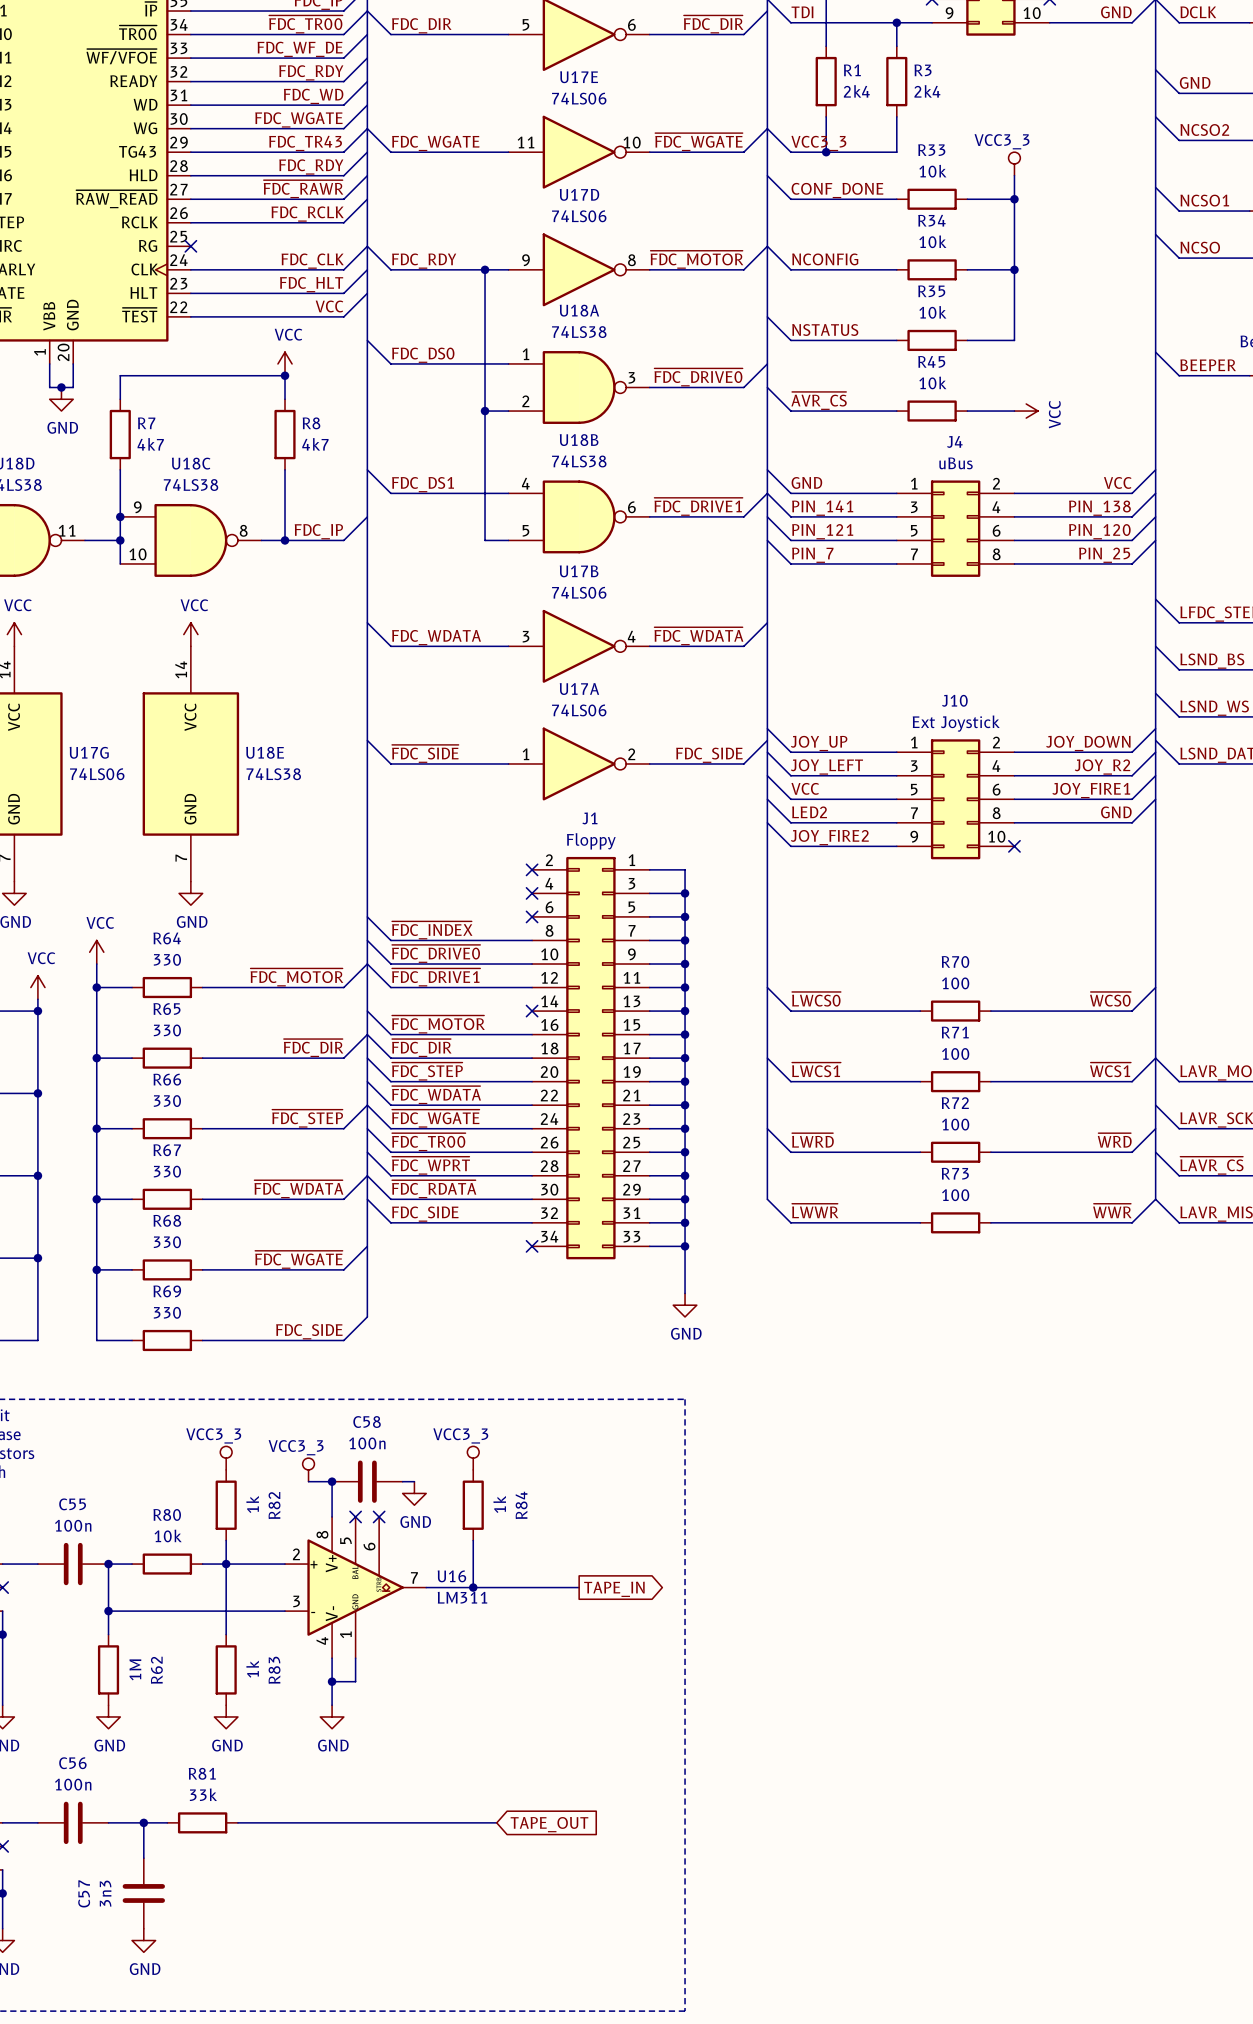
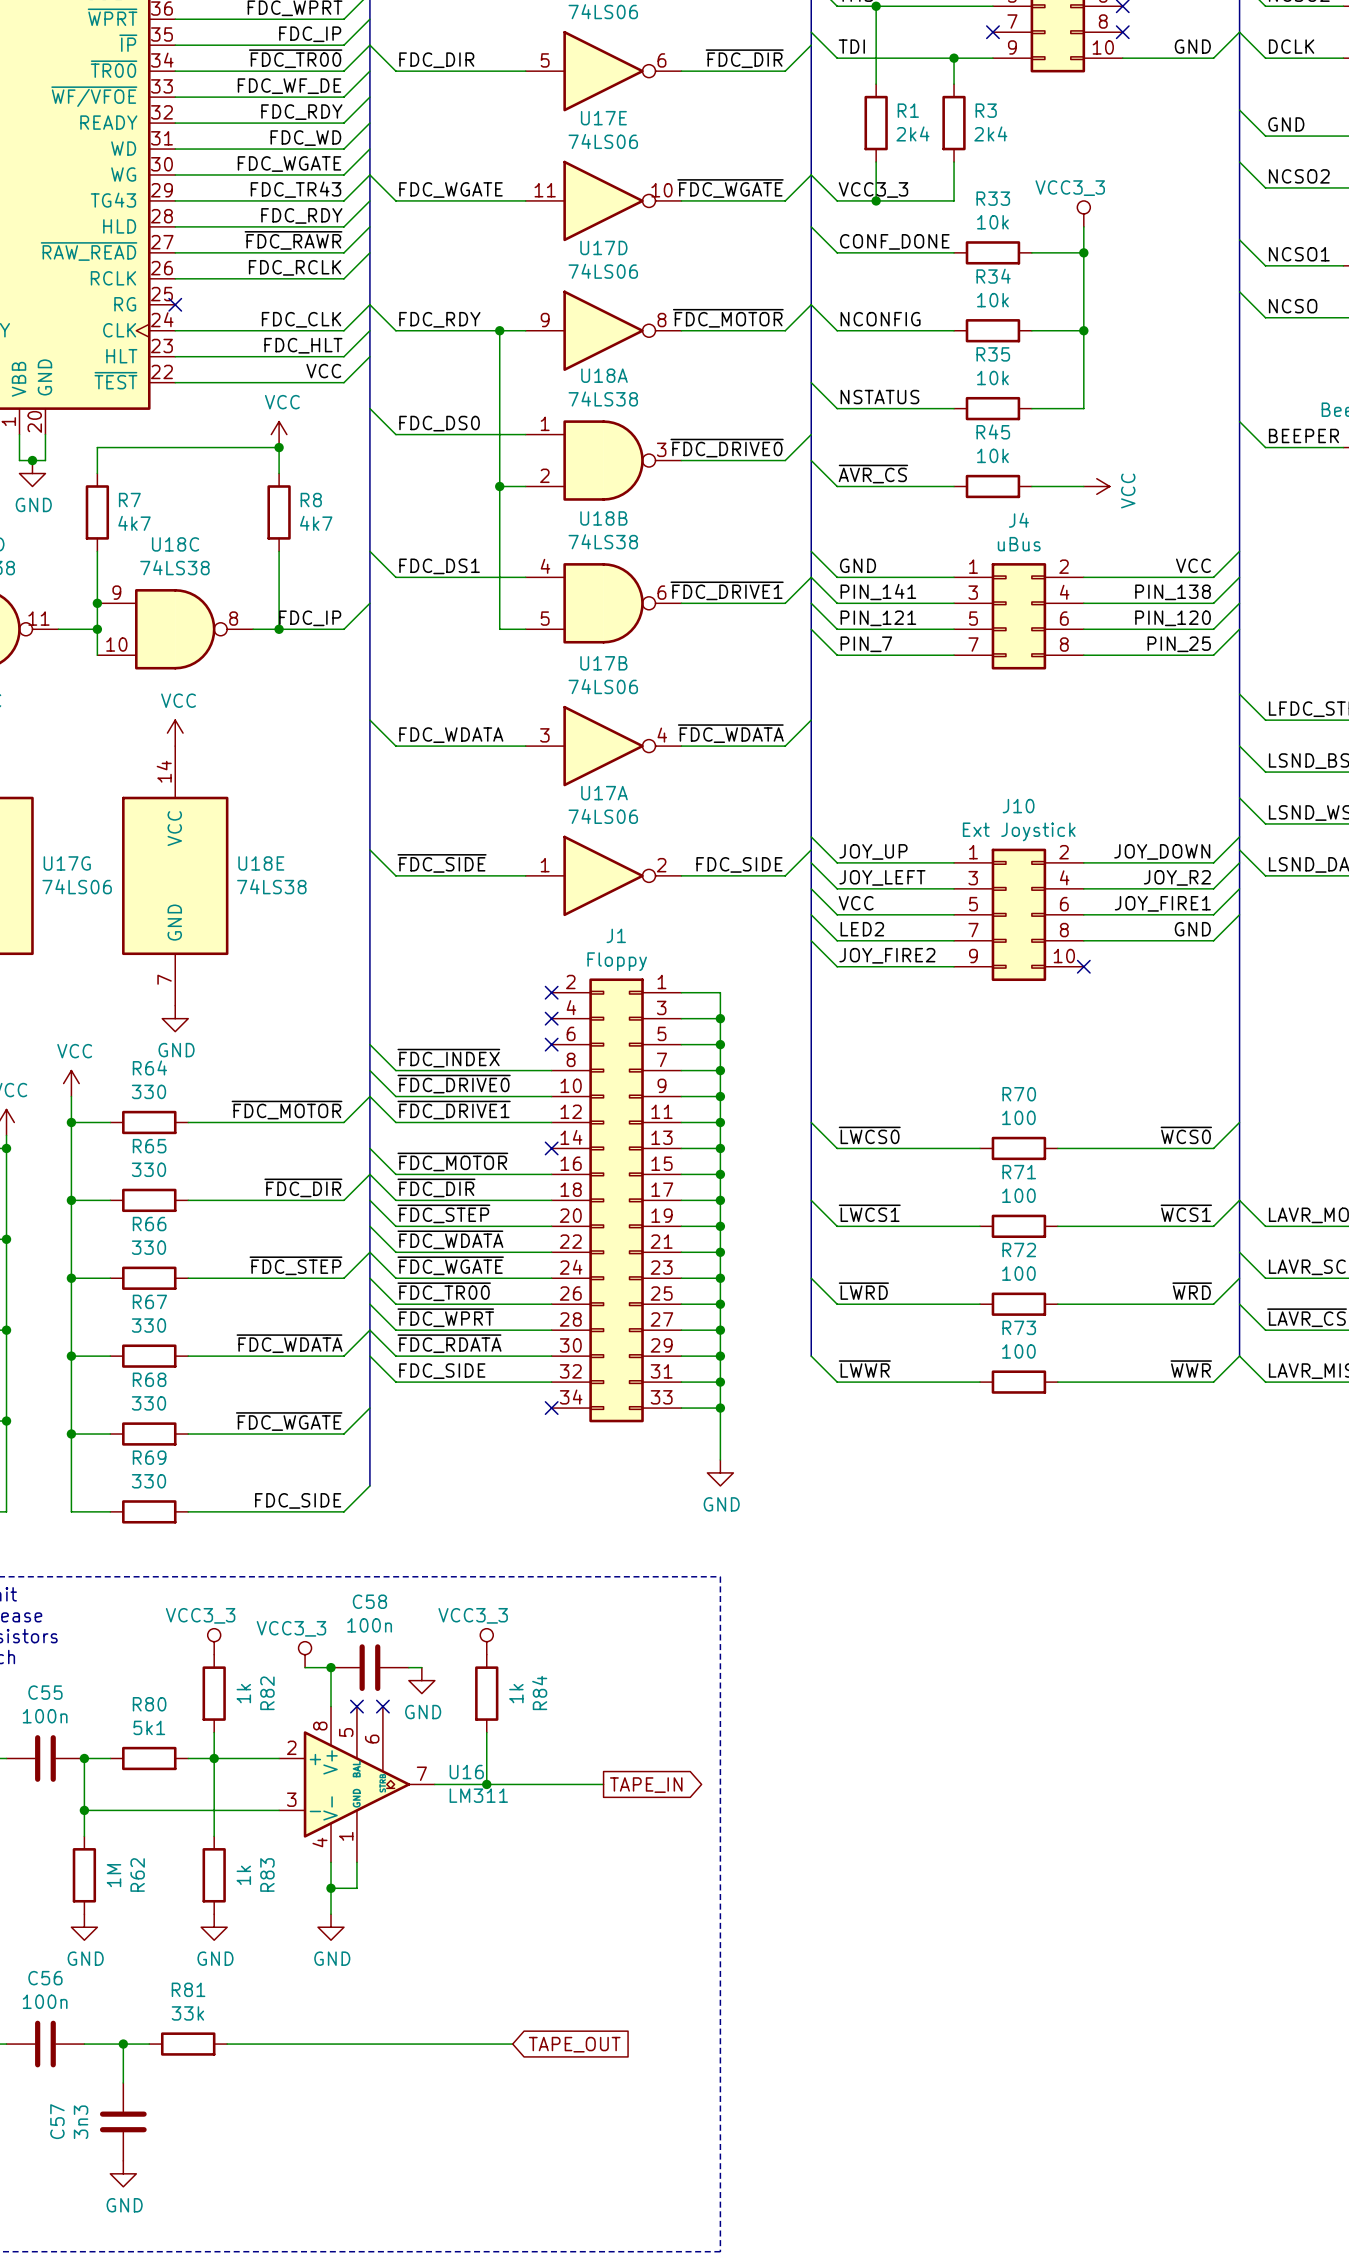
R80 value: 10k (168, 1535) -> 5k1 (149, 1727)

